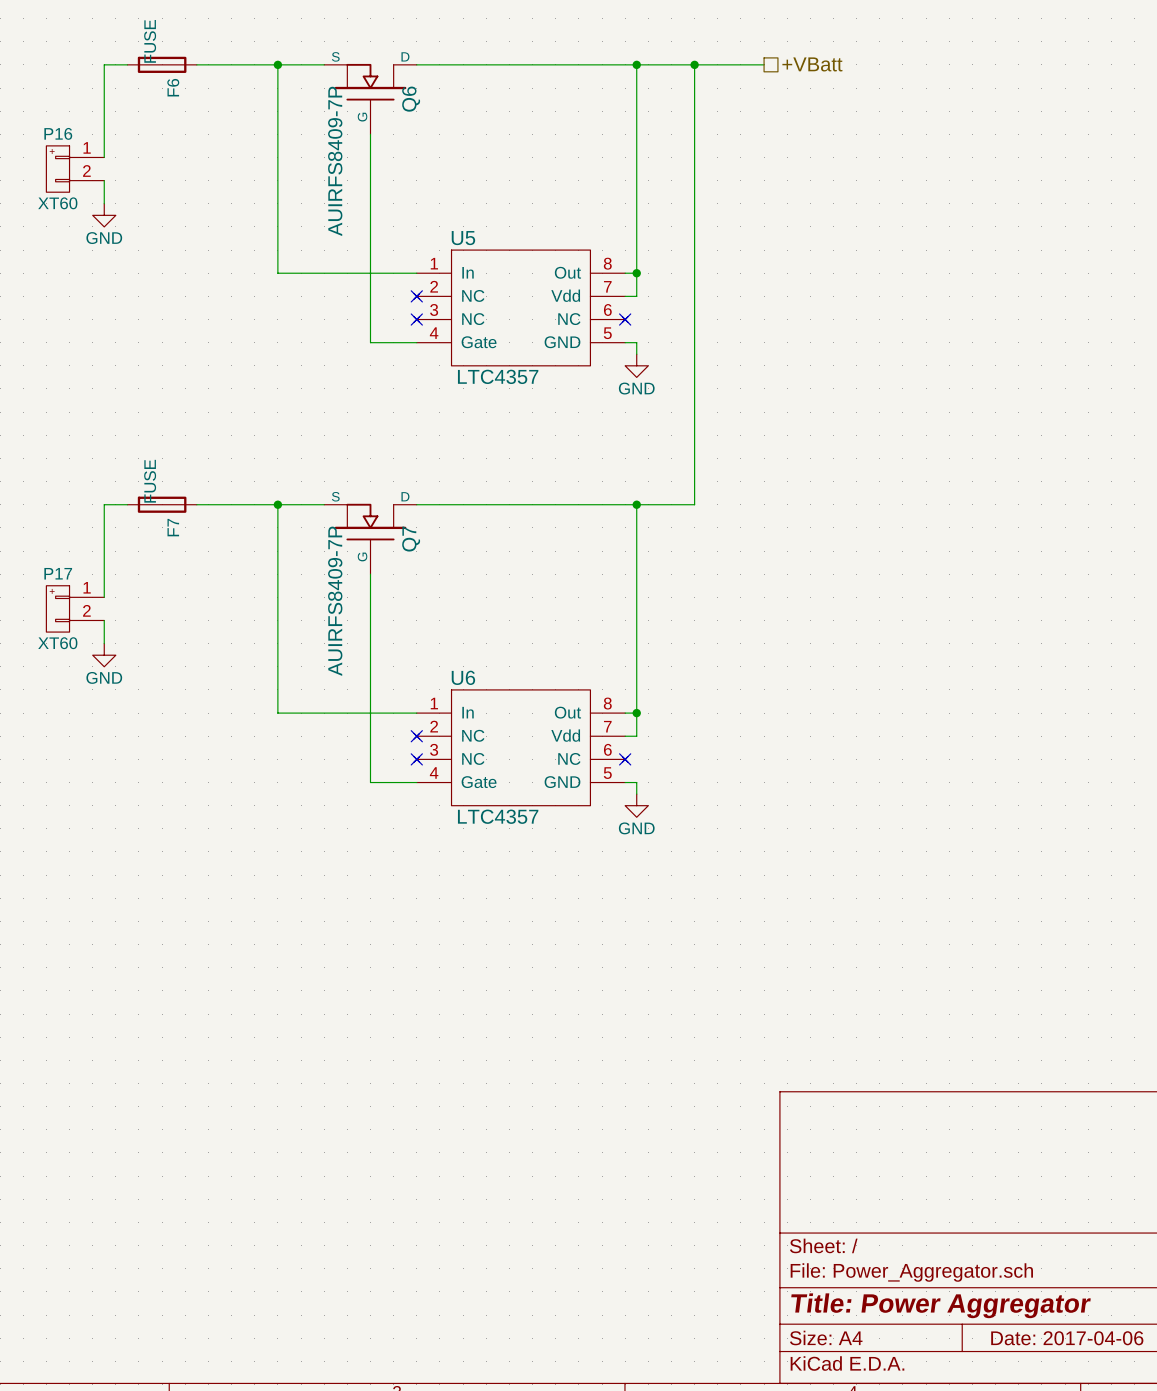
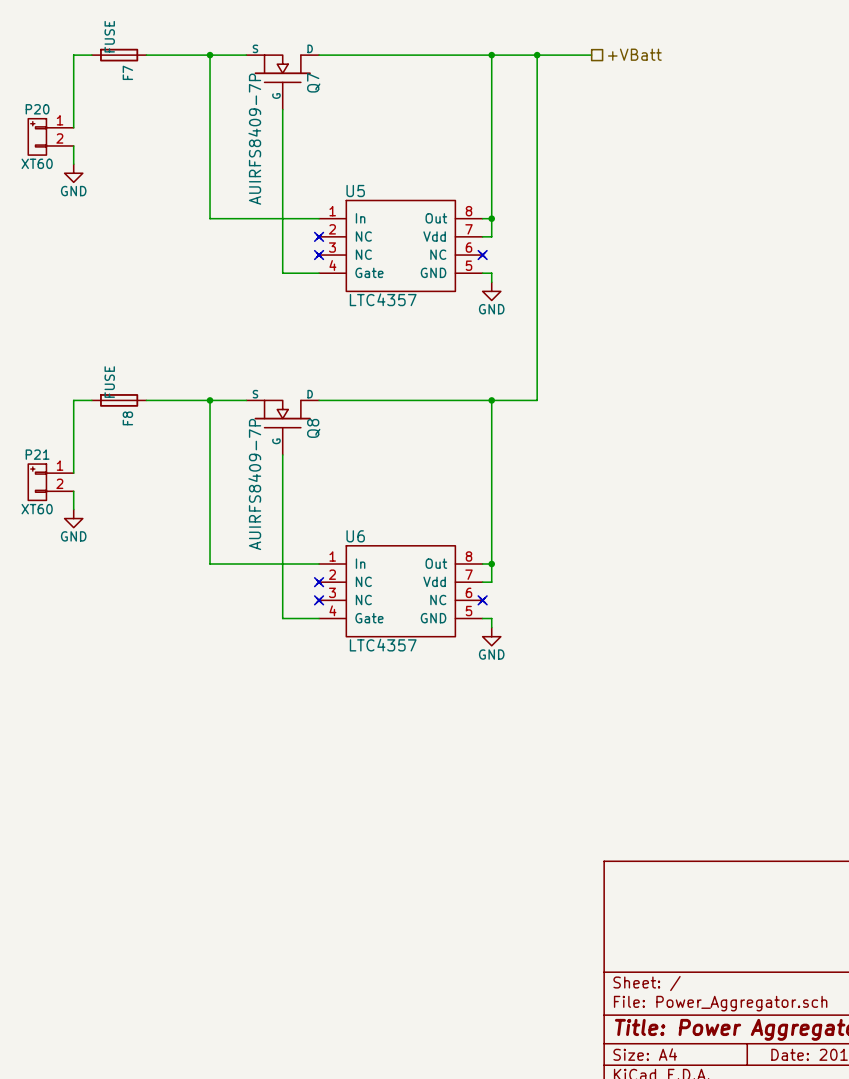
F6 name: F6 (173, 87) -> F7 (127, 72)
Q6 name: Q6 (411, 99) -> Q7 (313, 82)
P16 name: P16 (58, 133) -> P20 (37, 109)
F7 name: F7 (173, 527) -> F8 (127, 418)
Q7 name: Q7 (411, 539) -> Q8 (313, 428)
P17 name: P17 (58, 573) -> P21 (37, 454)

